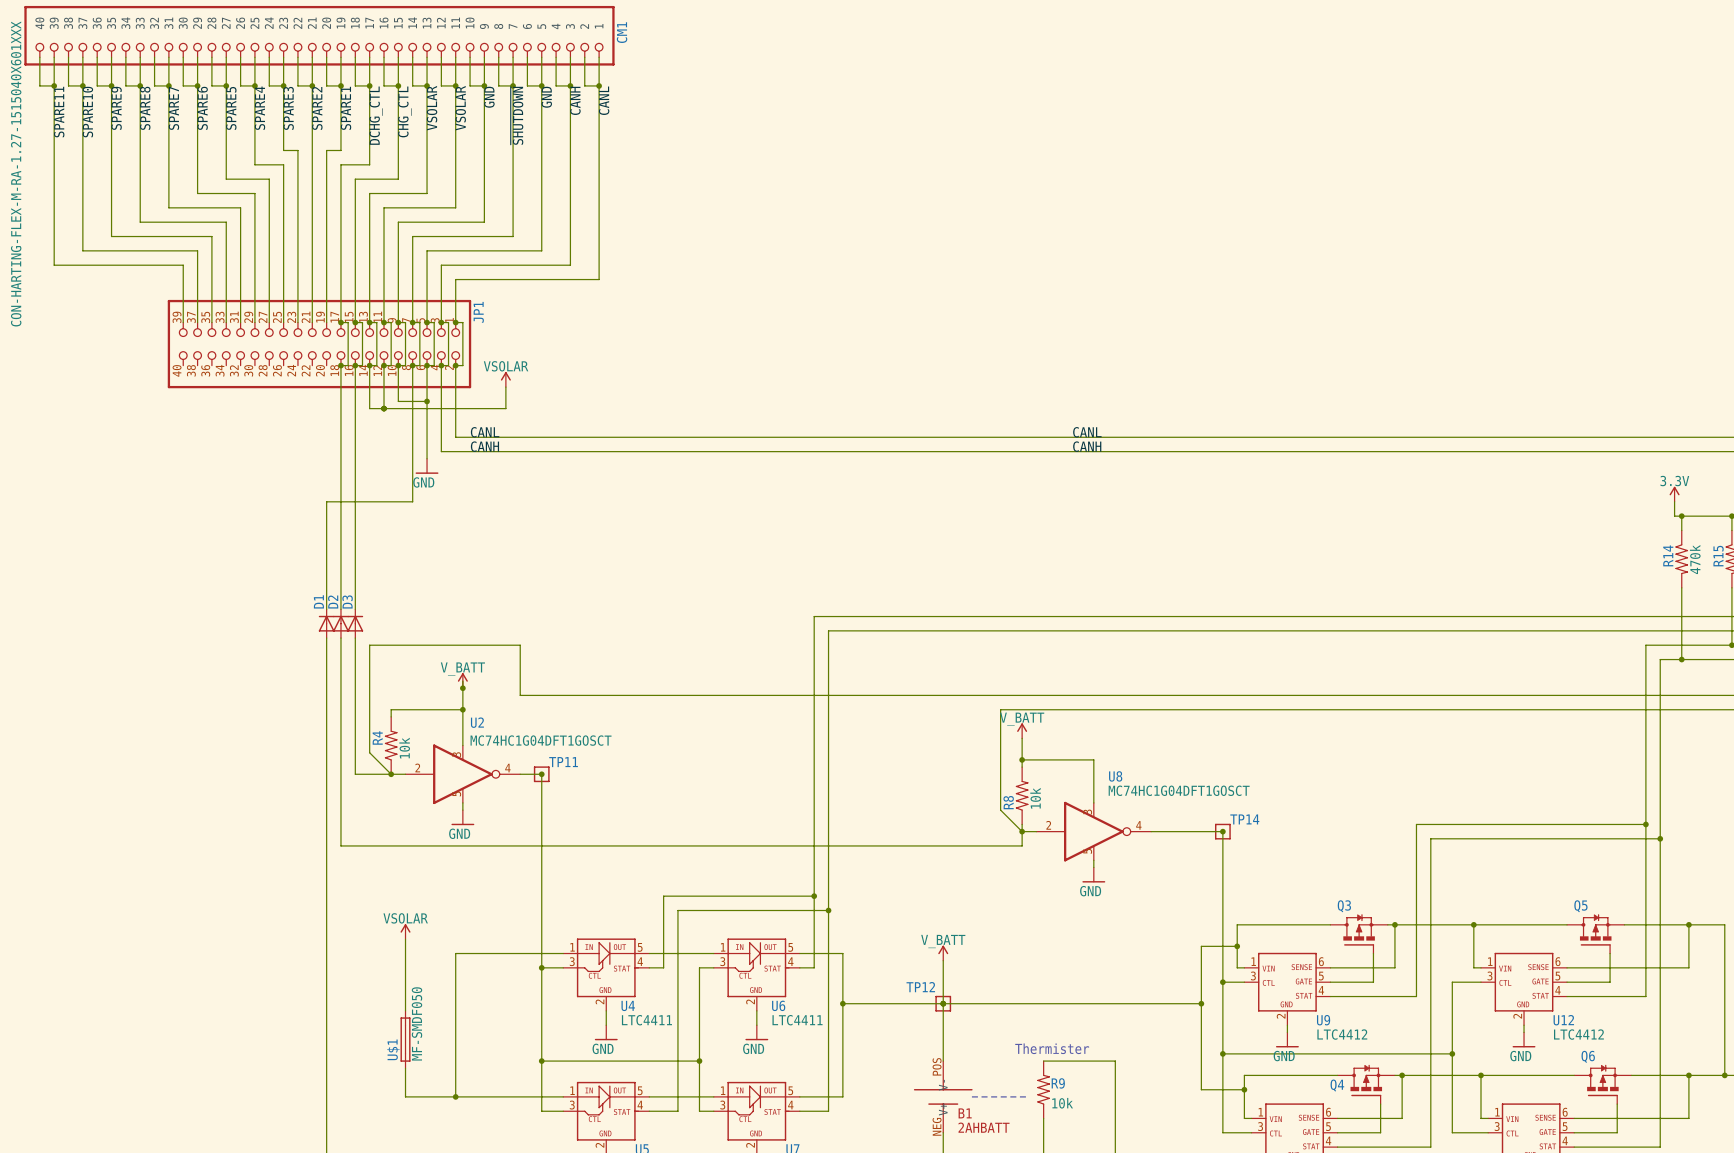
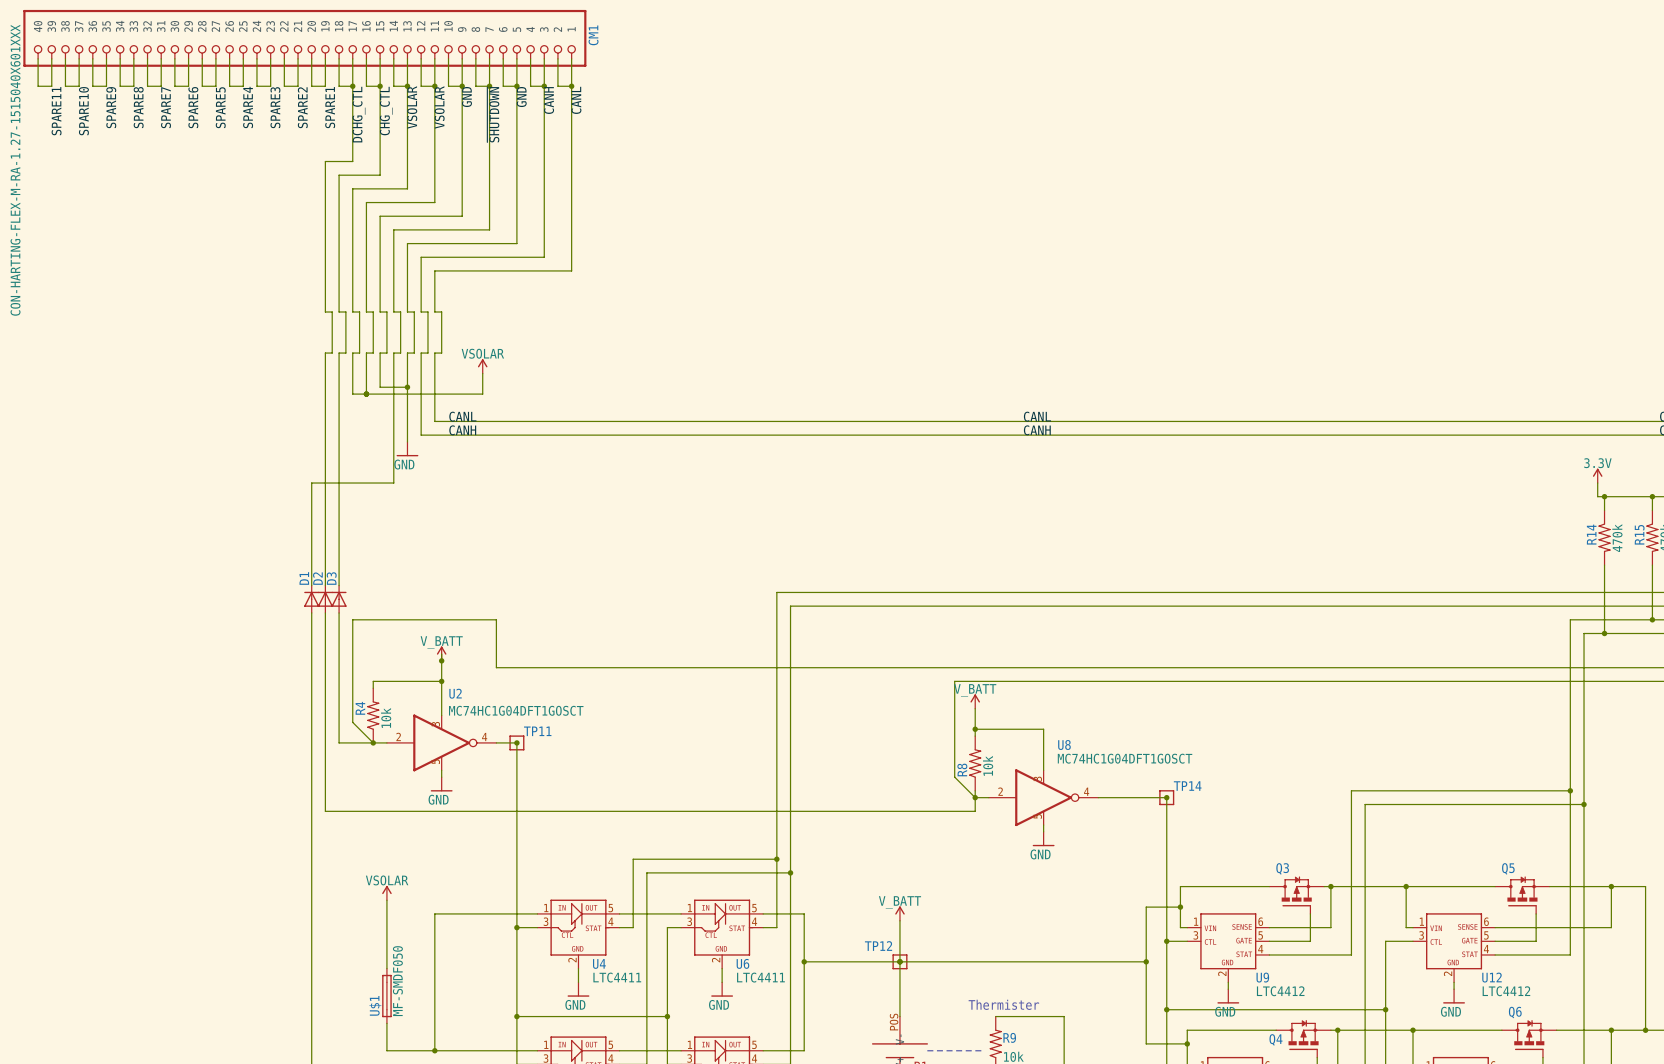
wire: (54, 85) (54, 265) (183, 265) (183, 322) -> none
junction: (54, 85) -> none
wire: (82, 85) (82, 250) (197, 250) (197, 322) -> none
junction: (82, 85) -> none
wire: (111, 85) (111, 236) (211, 236) (211, 322) -> none
junction: (111, 85) -> none
wire: (140, 85) (140, 222) (226, 222) (226, 322) -> none
junction: (140, 85) -> none
wire: (168, 85) (168, 207) (240, 207) (240, 322) -> none
junction: (168, 85) -> none
wire: (197, 85) (197, 193) (254, 193) (254, 322) -> none
junction: (197, 85) -> none
wire: (226, 85) (226, 179) (269, 179) (269, 322) -> none
junction: (226, 85) -> none
wire: (254, 85) (254, 164) (283, 164) (283, 322) -> none
junction: (254, 85) -> none
wire: (283, 85) (283, 150) (297, 150) (297, 322) -> none
junction: (283, 85) -> none
wire: (312, 85) (312, 322) -> none
junction: (312, 85) -> none
wire: (340, 85) (340, 150) (326, 150) (326, 322) -> none
junction: (340, 85) -> none
junction: (340, 322) -> none
junction: (355, 322) -> none
junction: (369, 322) -> none
junction: (384, 322) -> none
junction: (398, 322) -> none
junction: (412, 322) -> none
junction: (427, 322) -> none
junction: (441, 322) -> none
junction: (455, 322) -> none
JP1: (319, 344) -> none
junction: (340, 365) -> none
junction: (355, 365) -> none
junction: (369, 365) -> none
junction: (384, 365) -> none
junction: (398, 365) -> none
junction: (412, 365) -> none
junction: (427, 365) -> none
junction: (441, 365) -> none
junction: (455, 365) -> none

